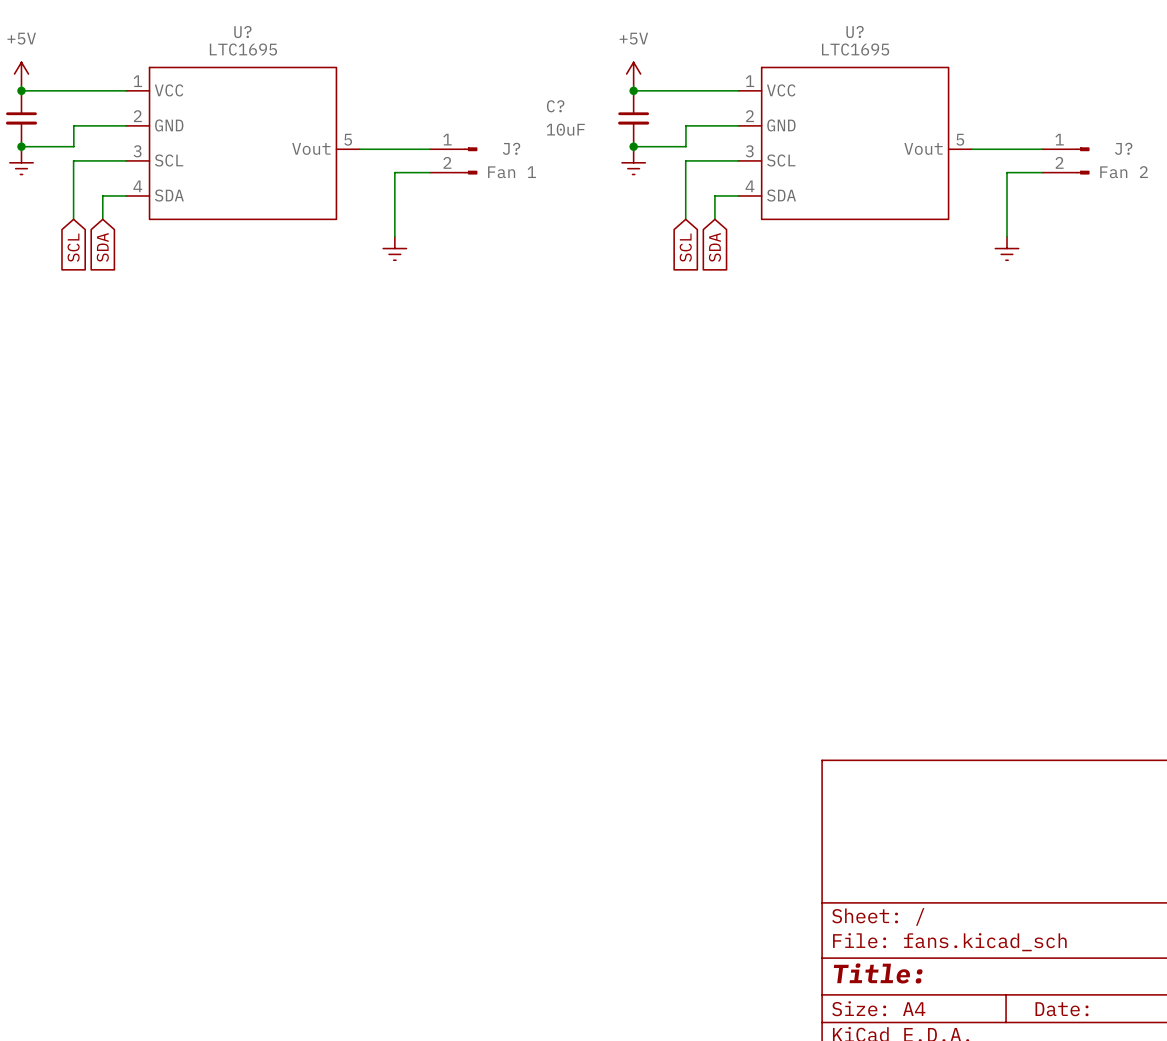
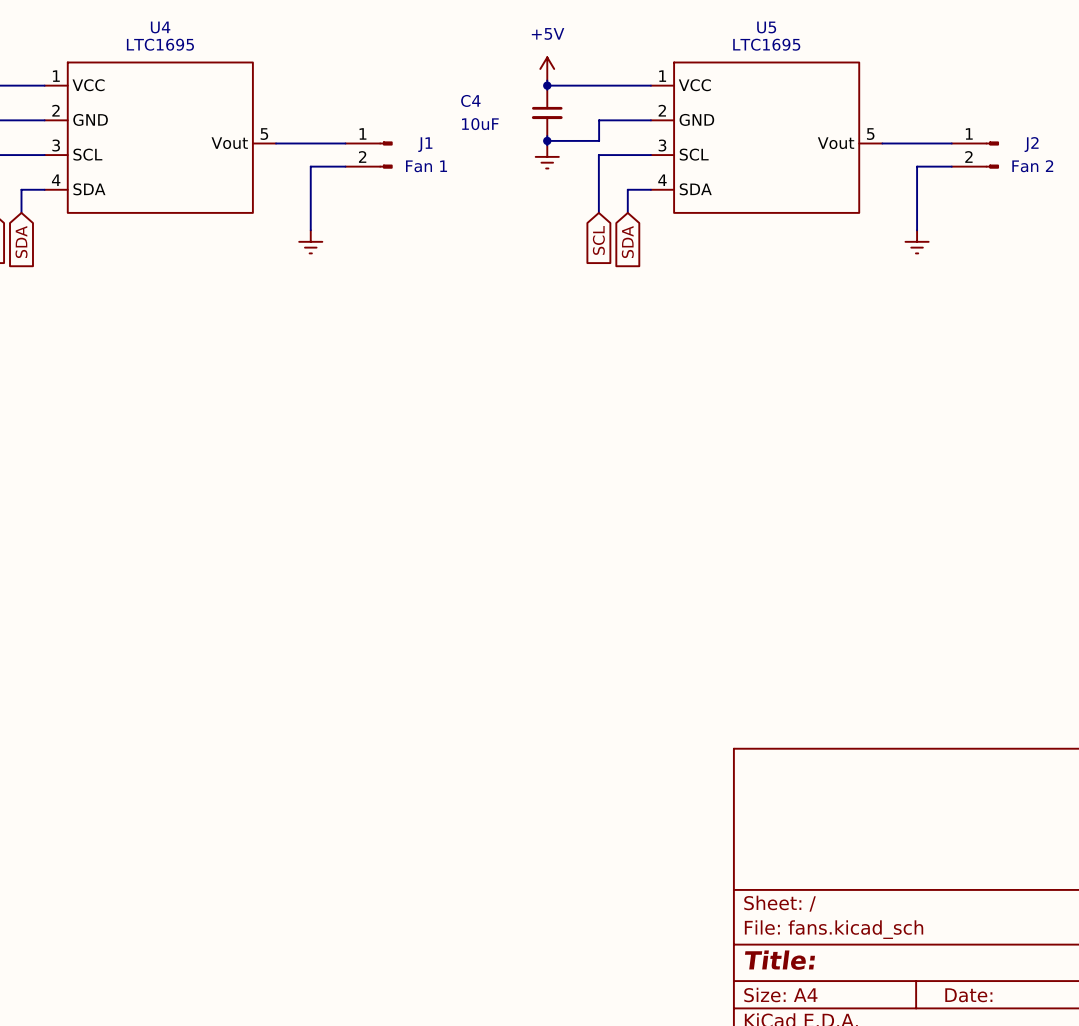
U? name: U? (242, 32) -> U4 (160, 27)
U? name: U? (855, 32) -> U5 (766, 27)
C? name: C? (555, 106) -> C4 (470, 100)
J? name: J? (511, 148) -> J1 (425, 144)
J? name: J? (1123, 148) -> J2 (1031, 144)

